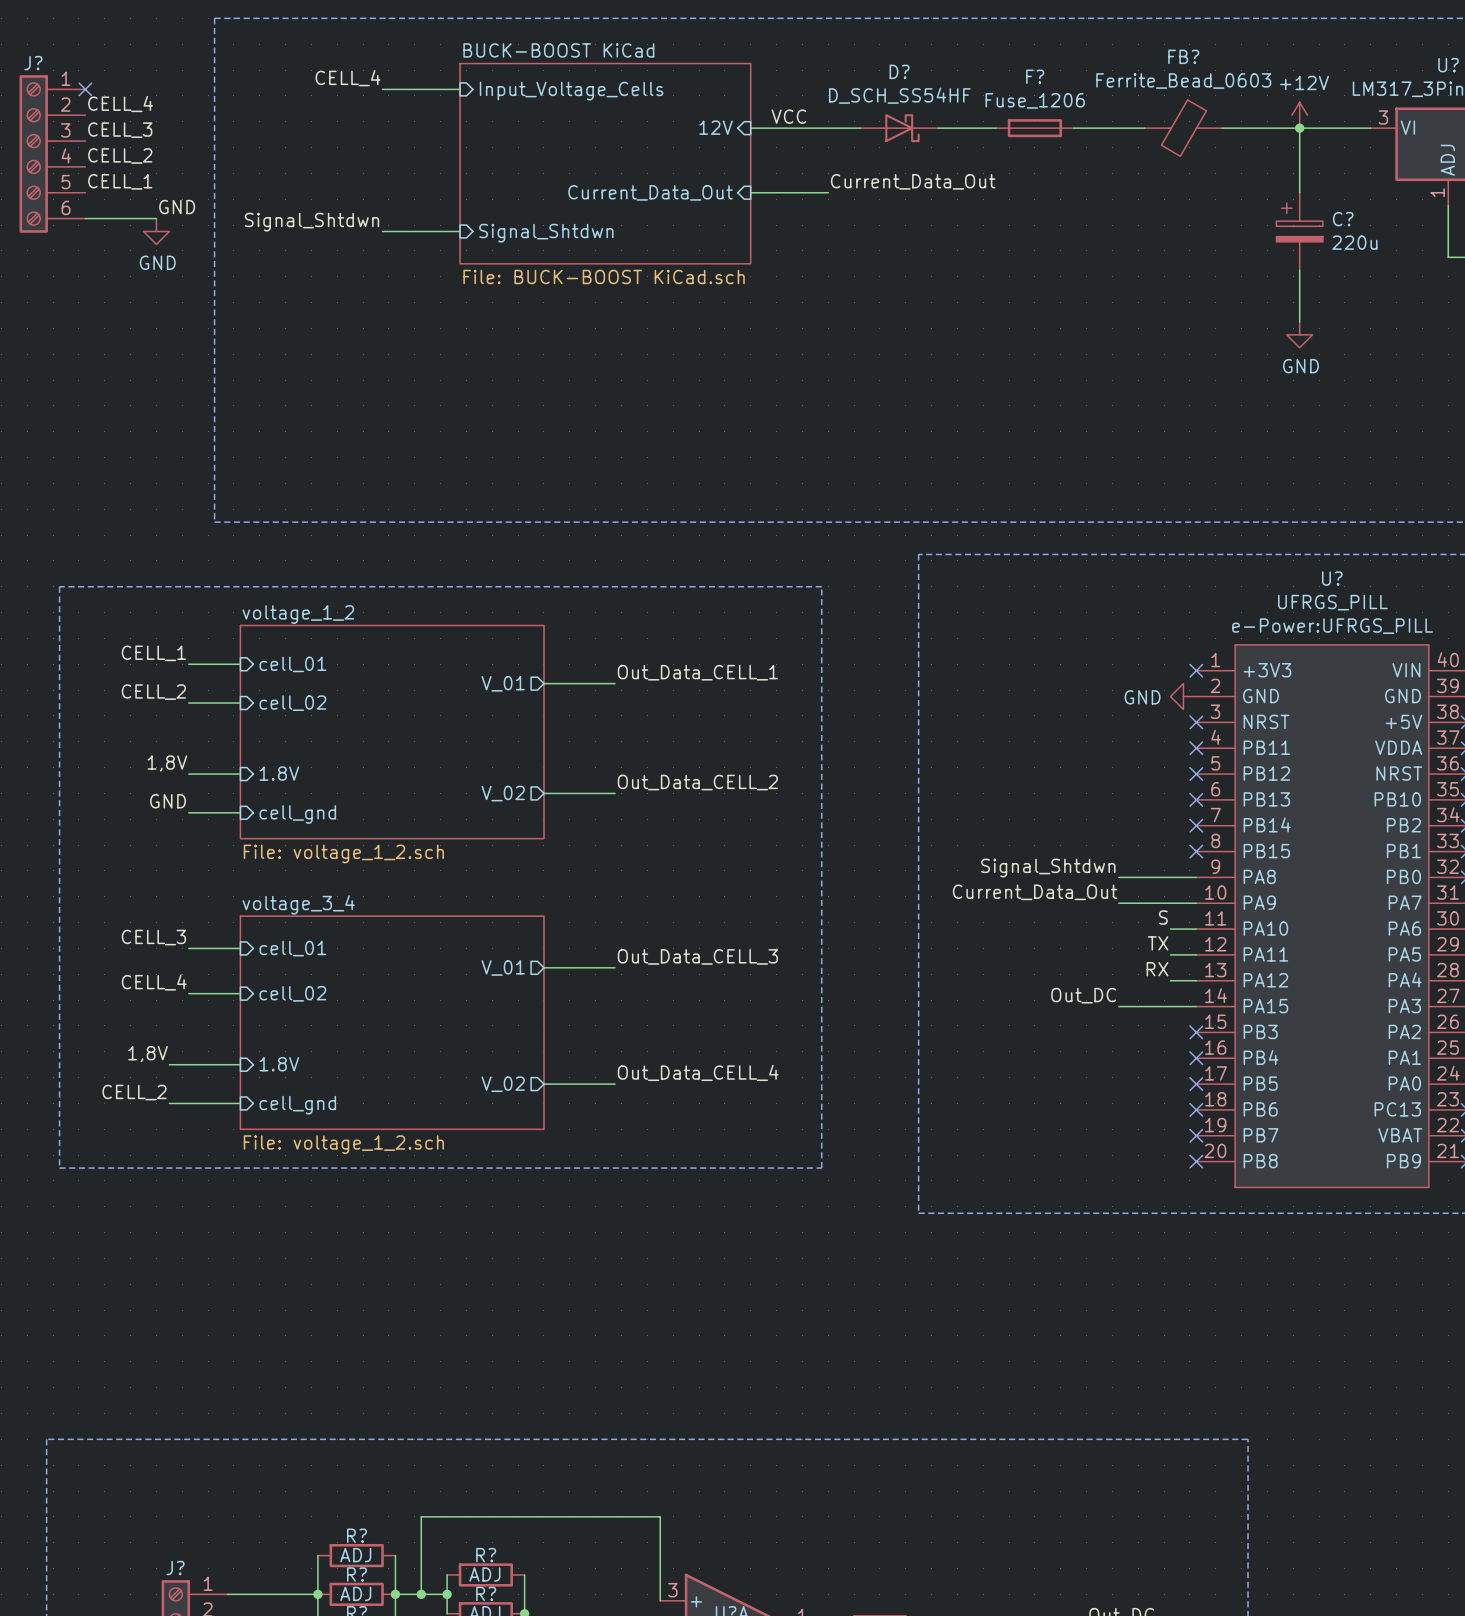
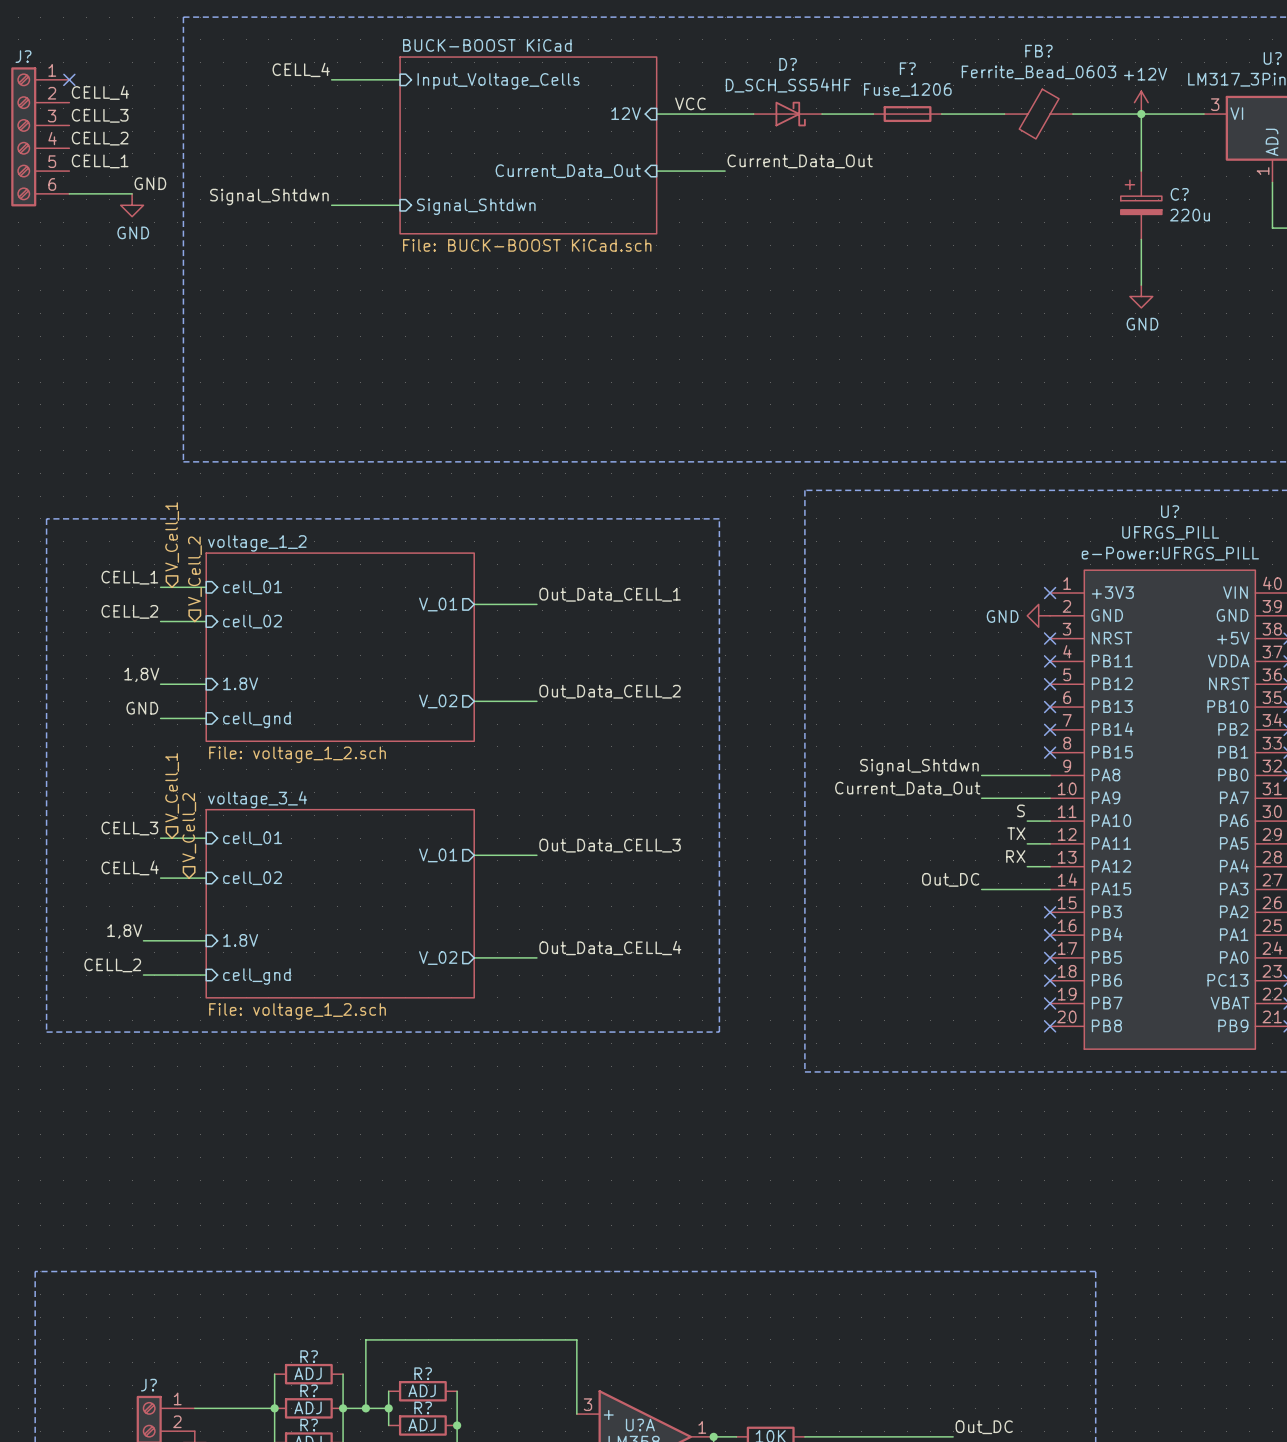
hierarchical label: none -> V_Cell_1 (172, 536)
hierarchical label: none -> V_Cell_2 (194, 571)
hierarchical label: none -> V_Cell_1 (172, 787)
hierarchical label: none -> V_Cell_2 (189, 827)

